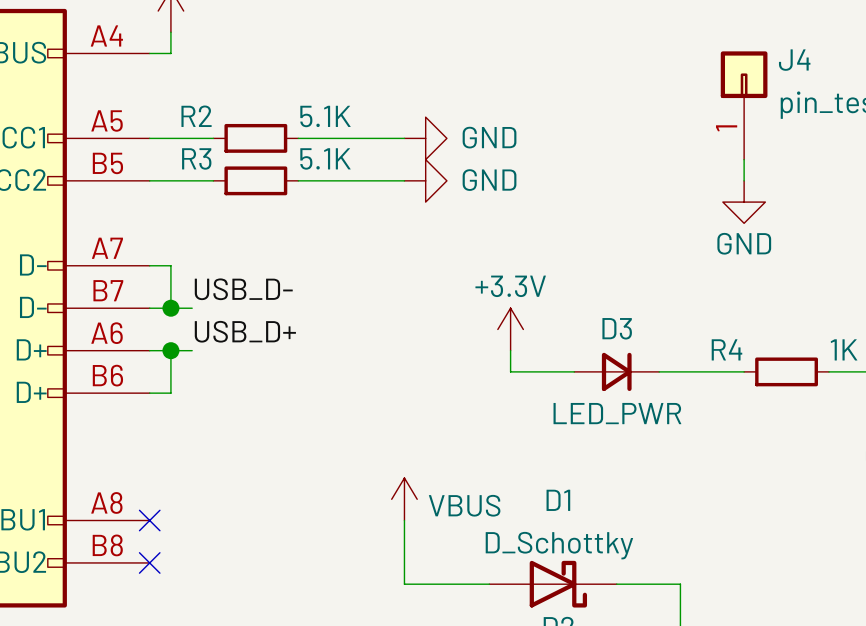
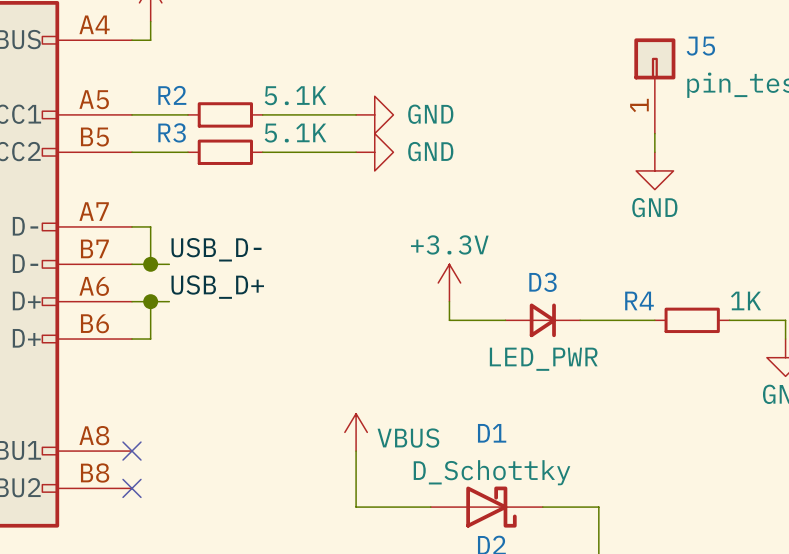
J4 name: J4 (794, 60) -> J5 (700, 46)

